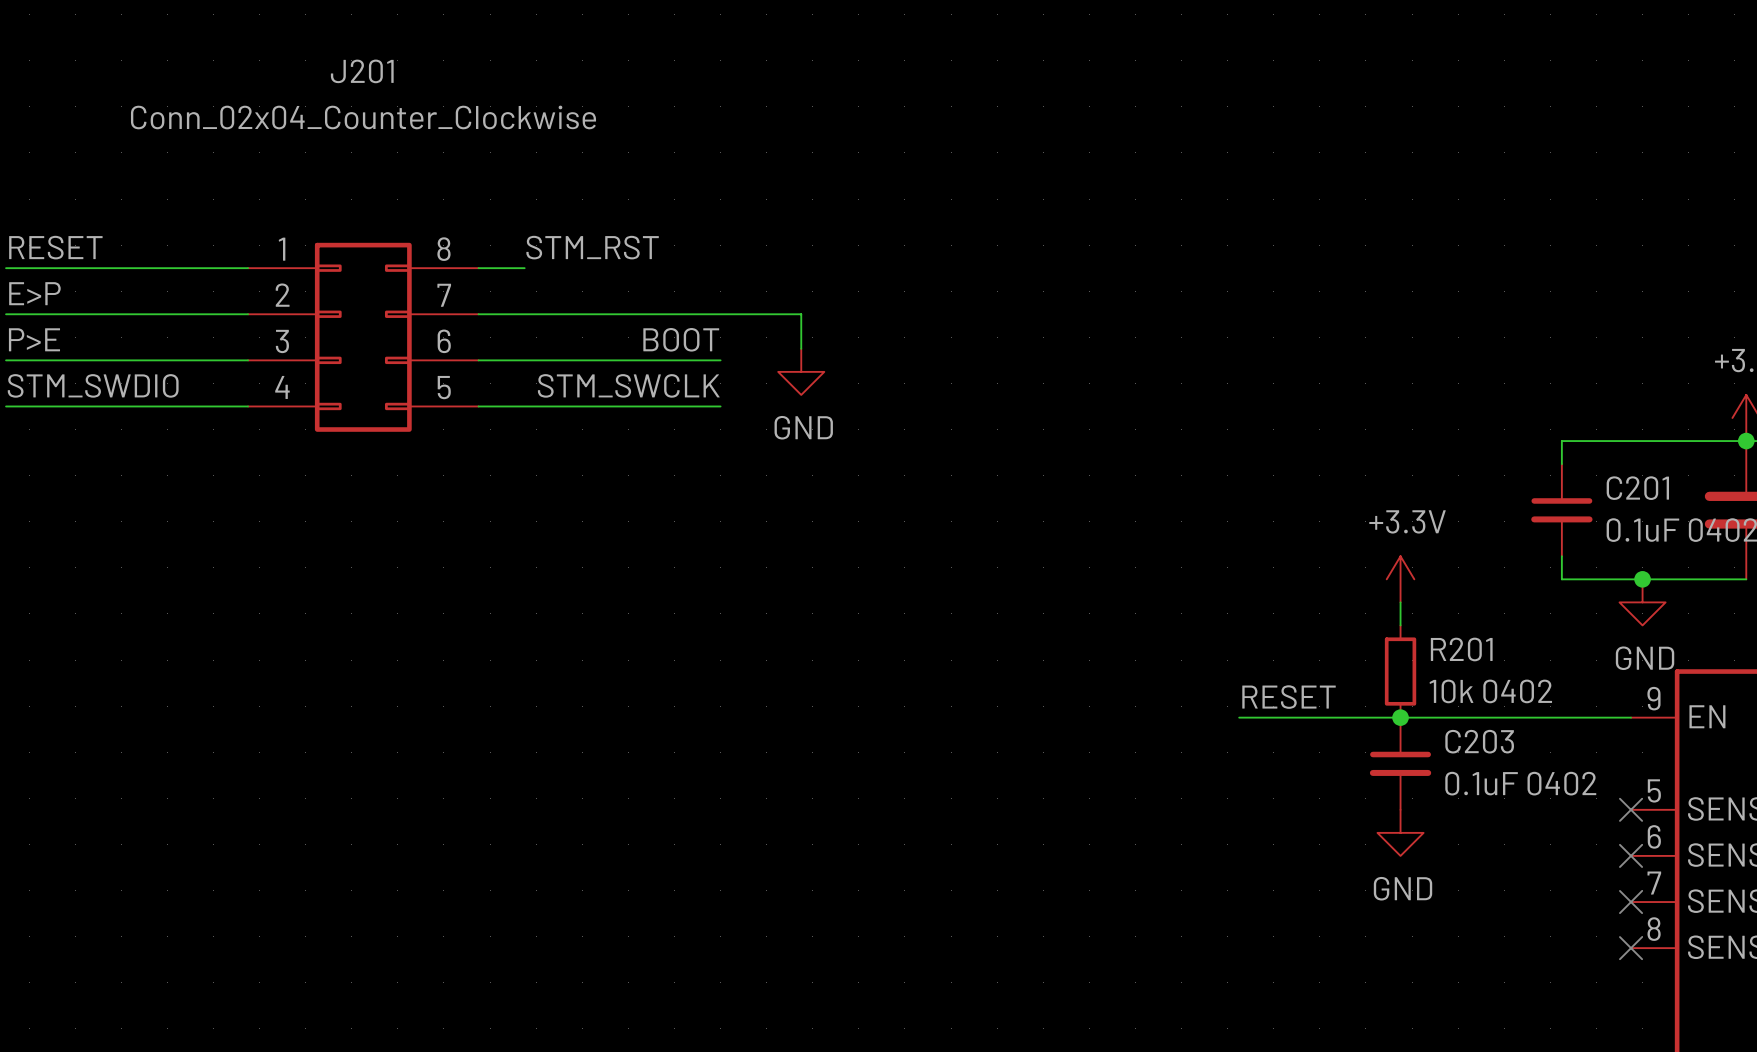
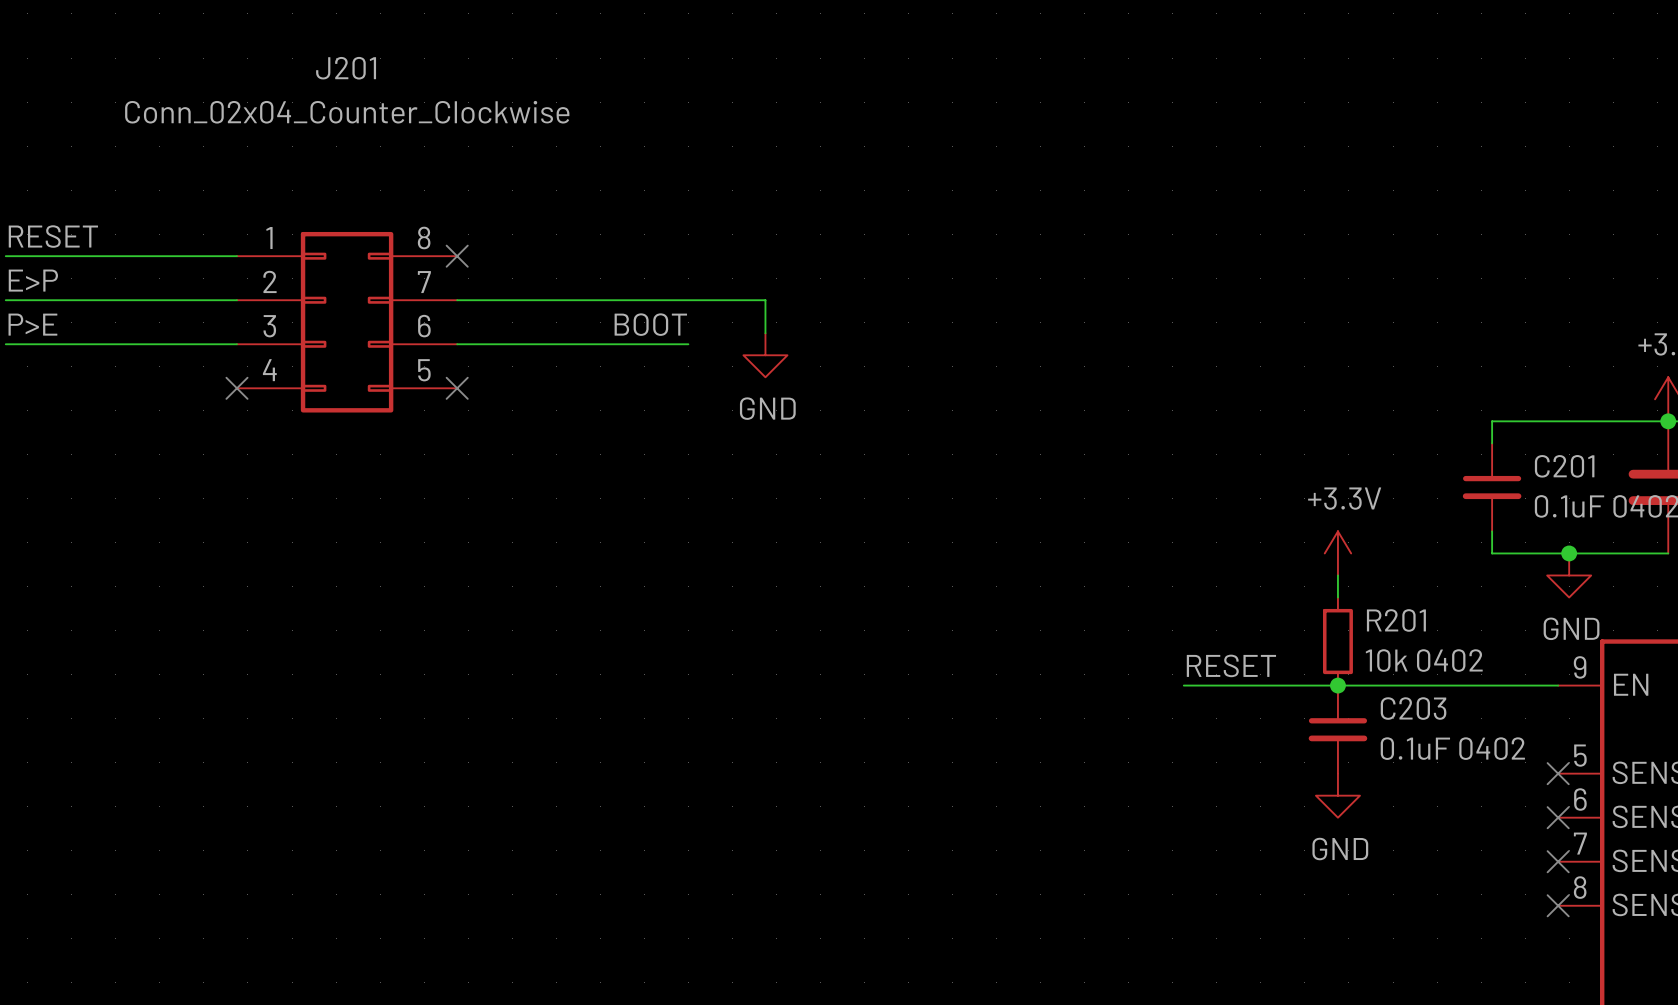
label: STM_RST (592, 247) -> none
wire: (478, 268) (524, 268) -> none
no-connect mark: none -> (457, 256)
label: STM_SWDIO (93, 385) -> none
label: STM_SWCLK (628, 385) -> none
wire: (6, 406) (248, 406) -> none
no-connect mark: none -> (236, 388)
wire: (478, 406) (720, 406) -> none
no-connect mark: none -> (457, 388)

